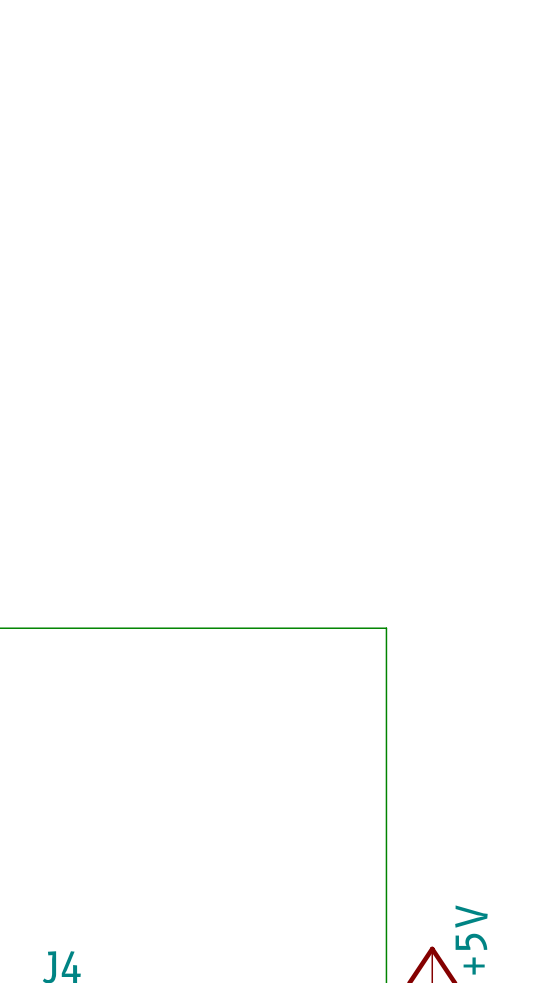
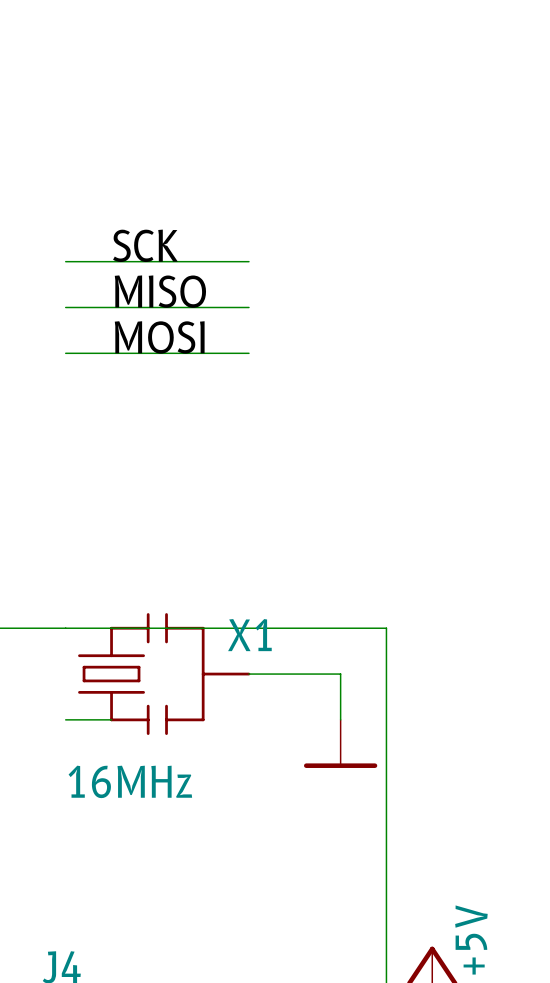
label: none -> SCK (145, 245)
wire: none -> (65, 261) (248, 261)
label: none -> MISO (160, 291)
wire: none -> (65, 307) (248, 307)
label: none -> MOSI (159, 337)
wire: none -> (65, 353) (248, 353)
X1: none -> 16MHz (164, 674)
wire: none -> (248, 674) (340, 674) (340, 719)
wire: none -> (65, 719) (111, 719)
power symbol: none -> (340, 743)

